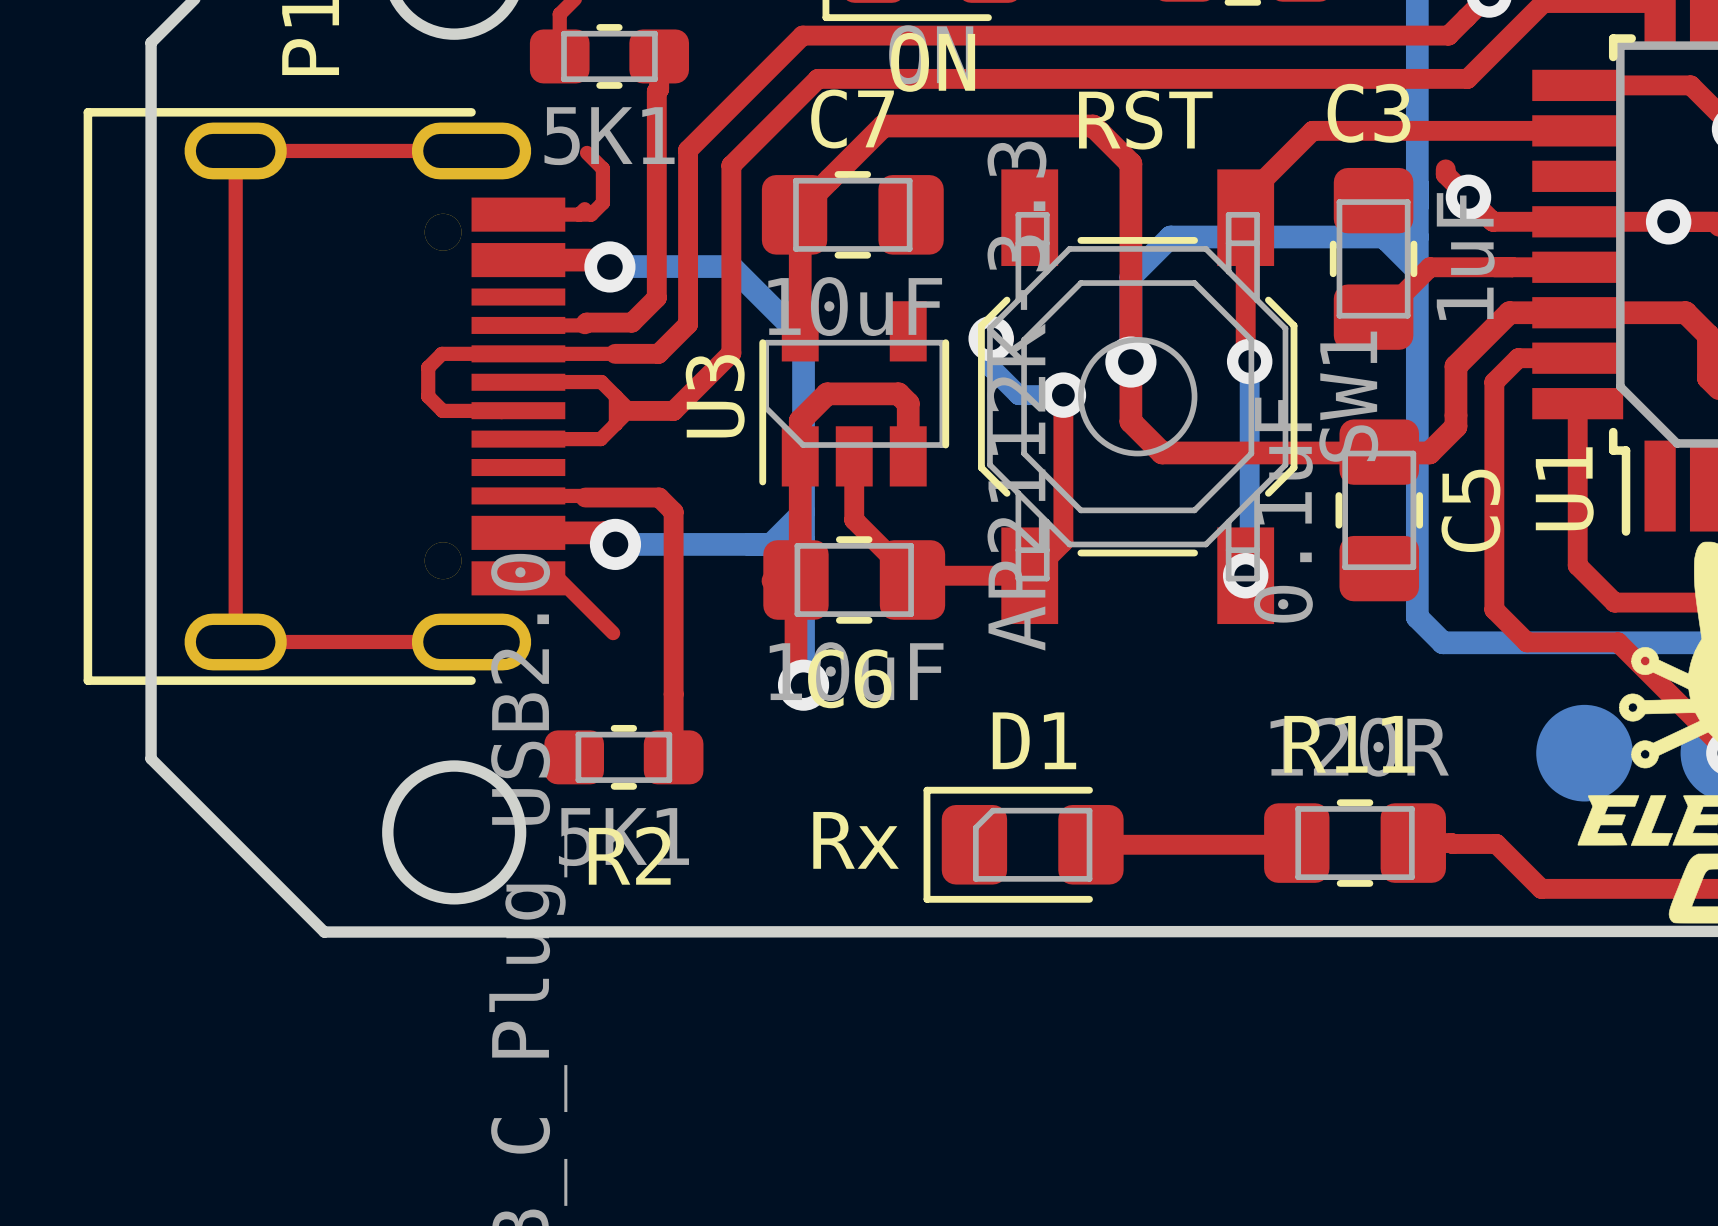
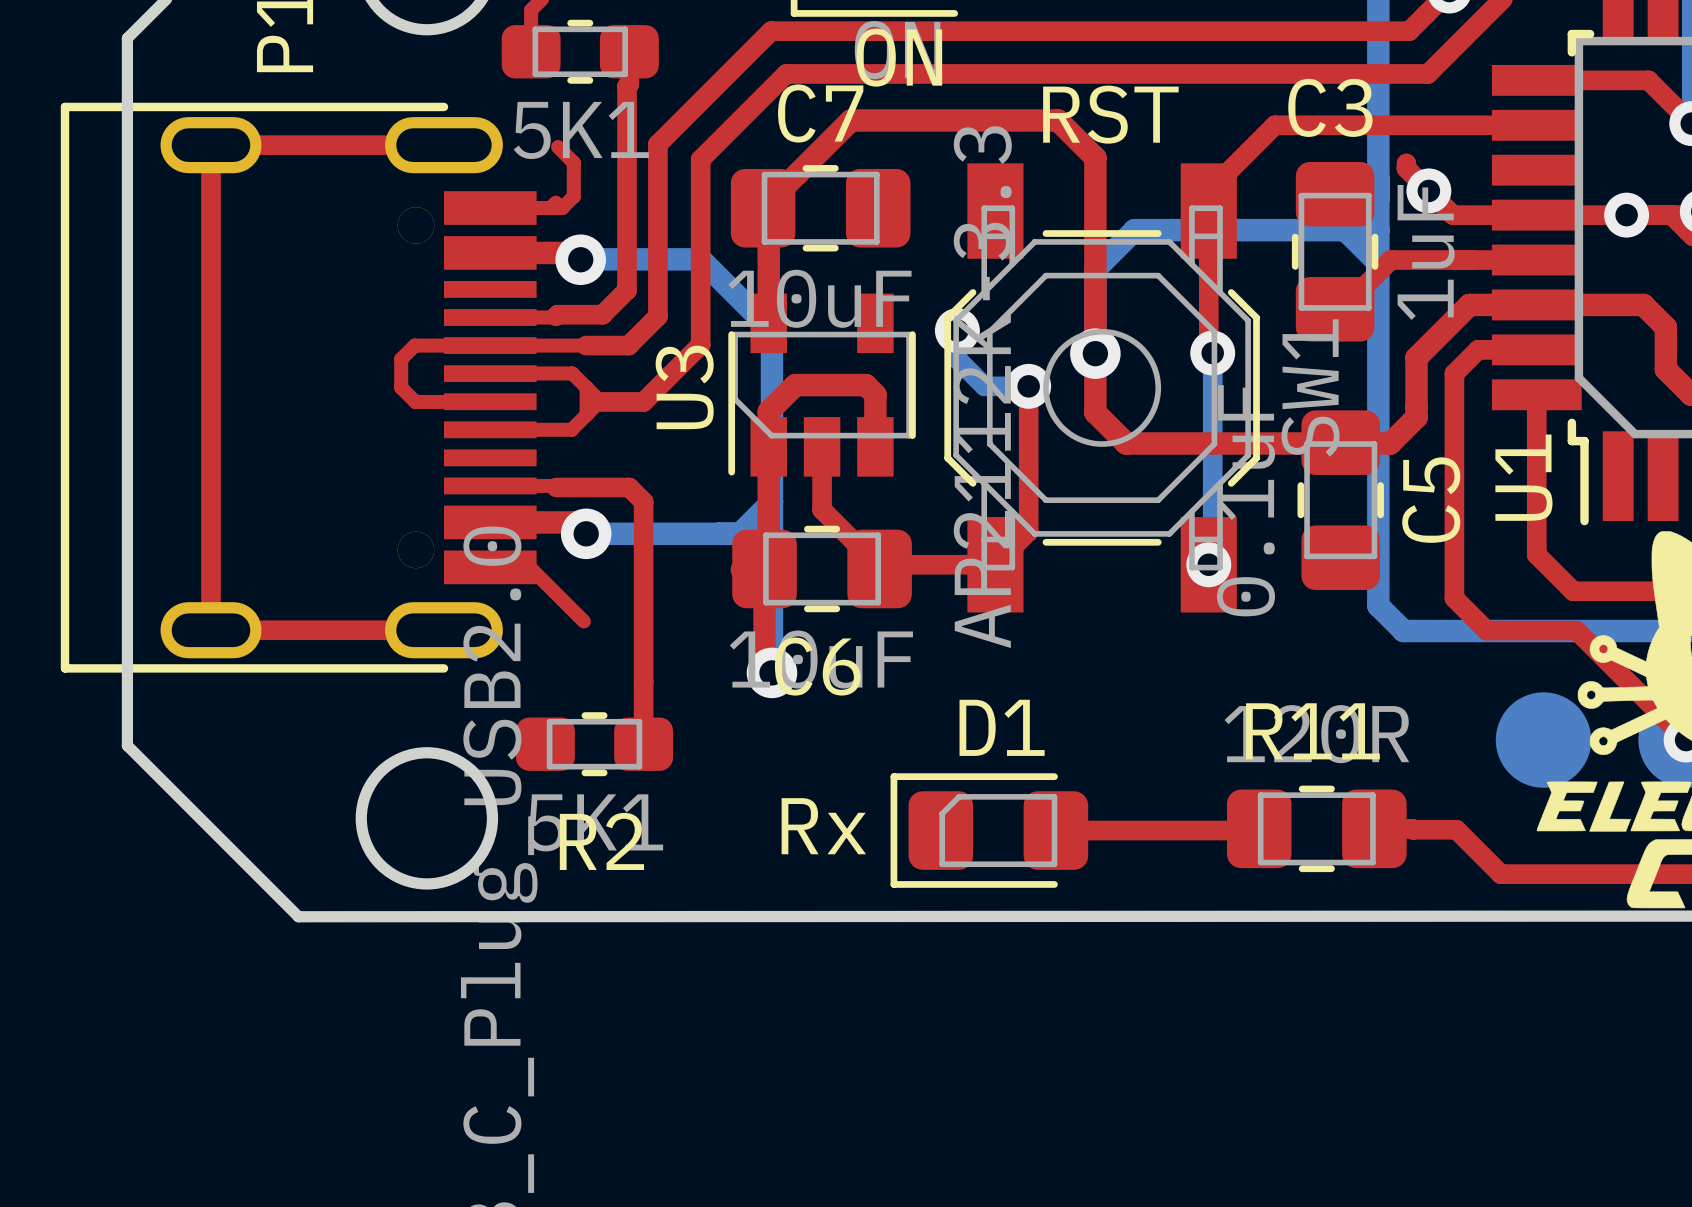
top track width: thin (431, 150) (235, 150) (235, 641) (471, 641) -> thick (404, 145) (210, 145) (210, 630) (443, 630)

